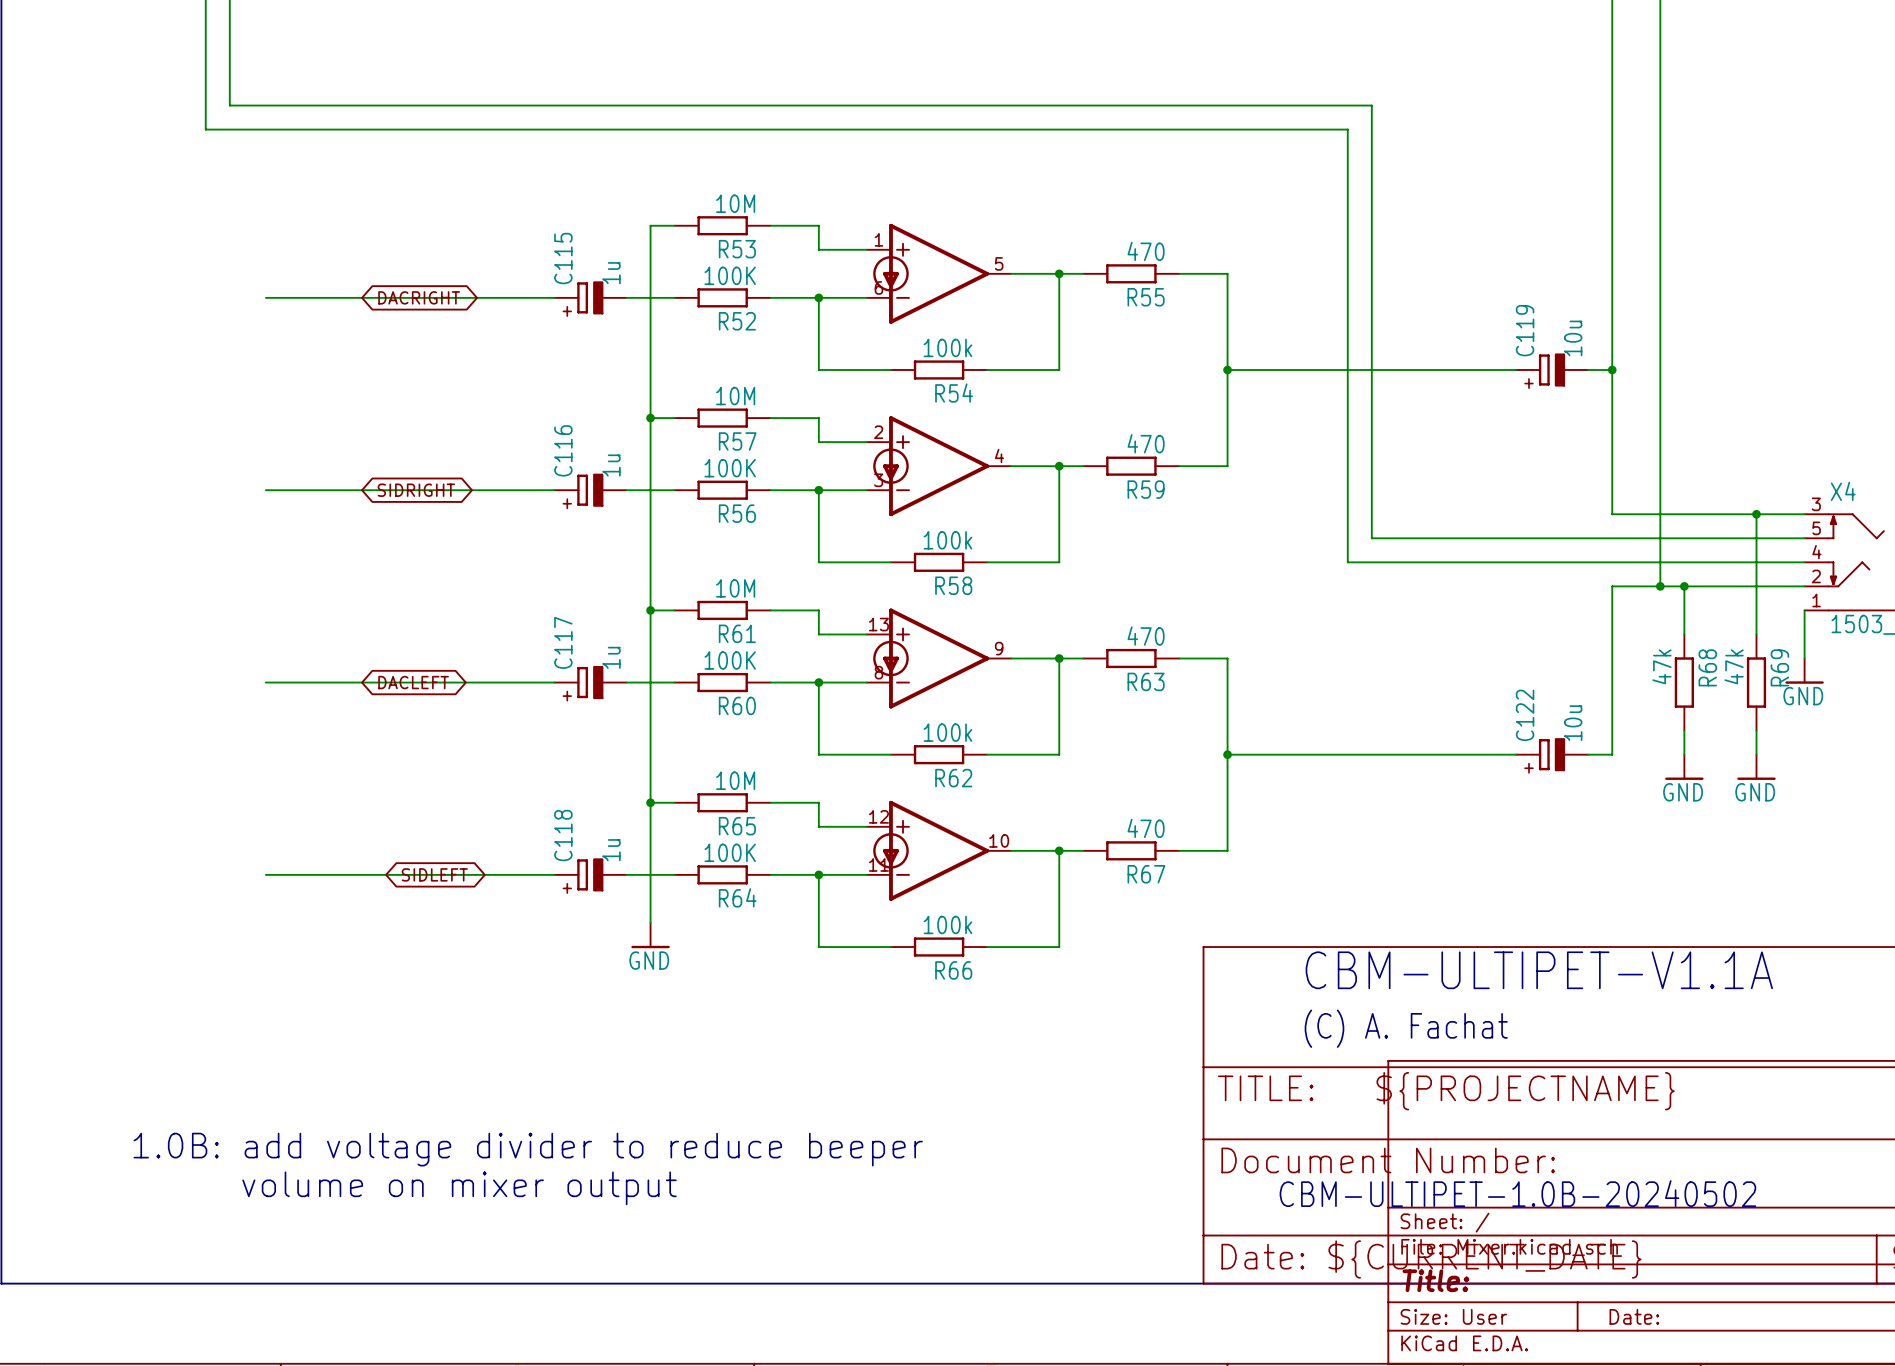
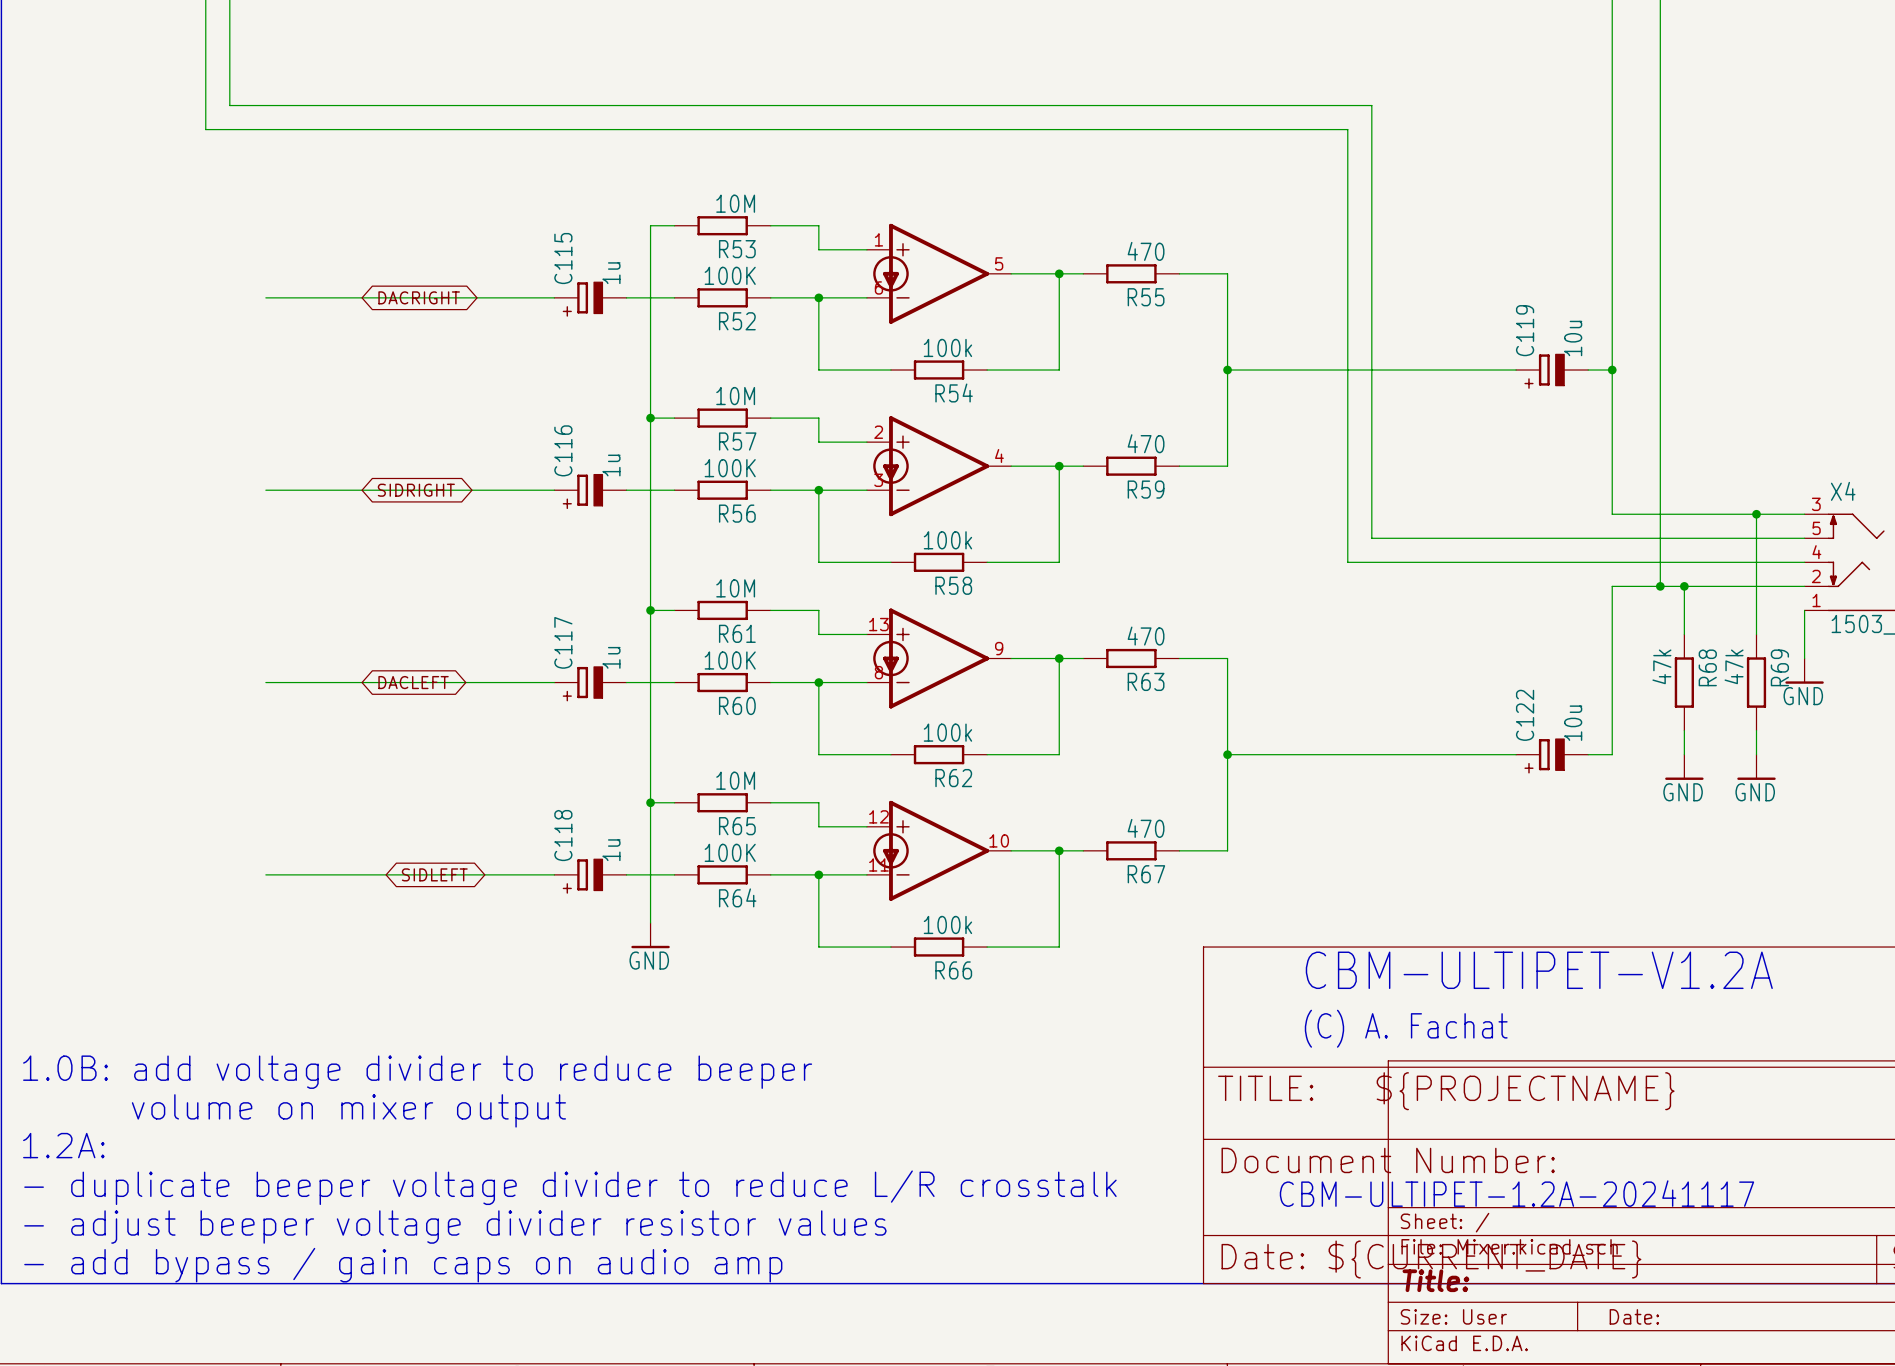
text: CBM-ULTIPET-V1.1A (1539, 970) -> CBM-ULTIPET-V1.2A (1539, 970)
text: none -> 1.2A: (63, 1145)
text position: 1.0B: add voltage divider to reduce beeper (528, 1149) -> 1.0B: add voltage divider to reduce beeper (417, 1072)
text: none -> - duplicate beeper voltage divider to reduce L/R crosstalk (570, 1187)
text position: volume on mixer output (459, 1188) -> volume on mixer output (348, 1110)
text: CBM-ULTIPET-1.0B-20240502 (1517, 1193) -> CBM-ULTIPET-1.2A-20241117 (1516, 1193)
text: none -> - adjust beeper voltage divider resistor values (455, 1227)
text: none -> - add bypass / gain caps on audio amp (403, 1265)

